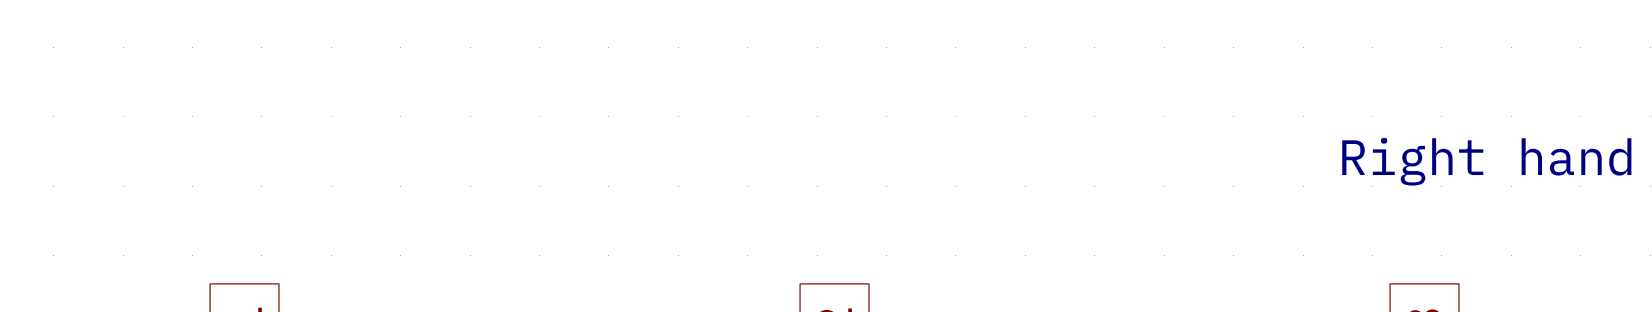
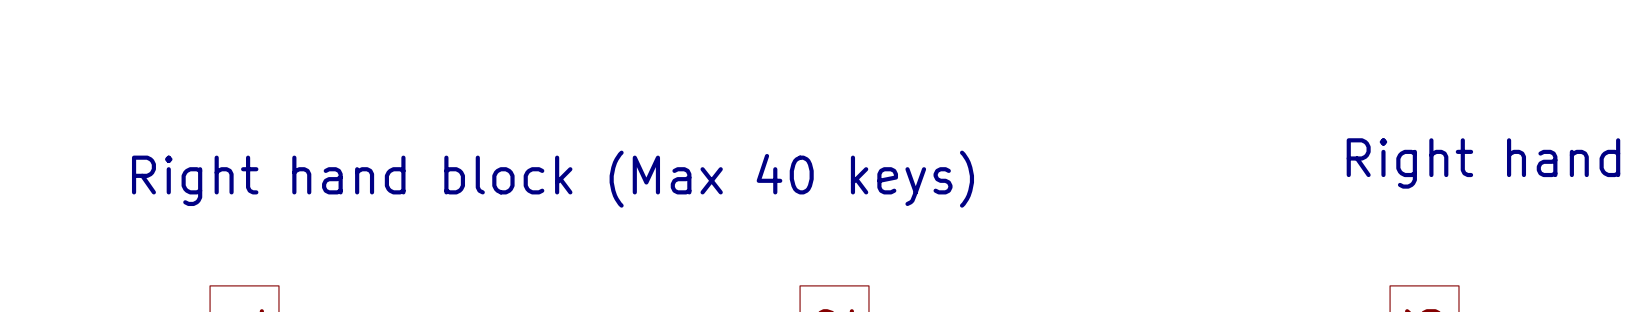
text: none -> Right hand block (Max 40 keys) (553, 179)

